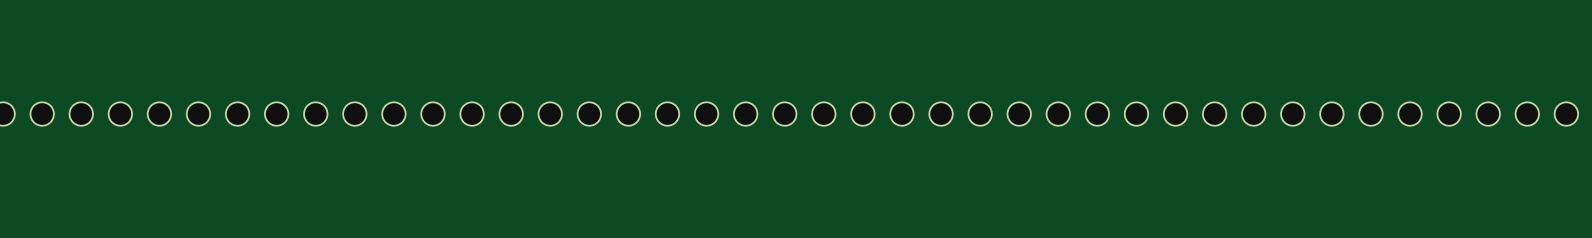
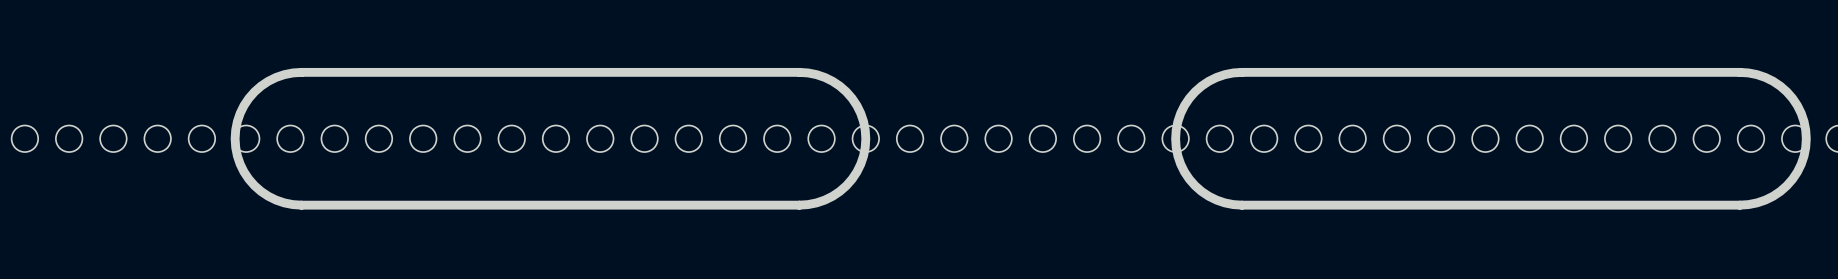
board edge: none -> (799, 72) (292, 72) (268, 81) (248, 98) (237, 121) (235, 147) (240, 164) (254, 185) (276, 200) (292, 204) (808, 204) (832, 196) (852, 179) (863, 155) (865, 130) (856, 105) (839, 86) (824, 77) (799, 72)
board edge: none -> (1739, 72) (1233, 72) (1208, 81) (1189, 98) (1177, 121) (1176, 147) (1180, 164) (1195, 185) (1216, 200) (1233, 204) (1748, 204) (1773, 196) (1792, 179) (1804, 155) (1805, 130) (1797, 105) (1780, 86) (1765, 77) (1739, 72)

